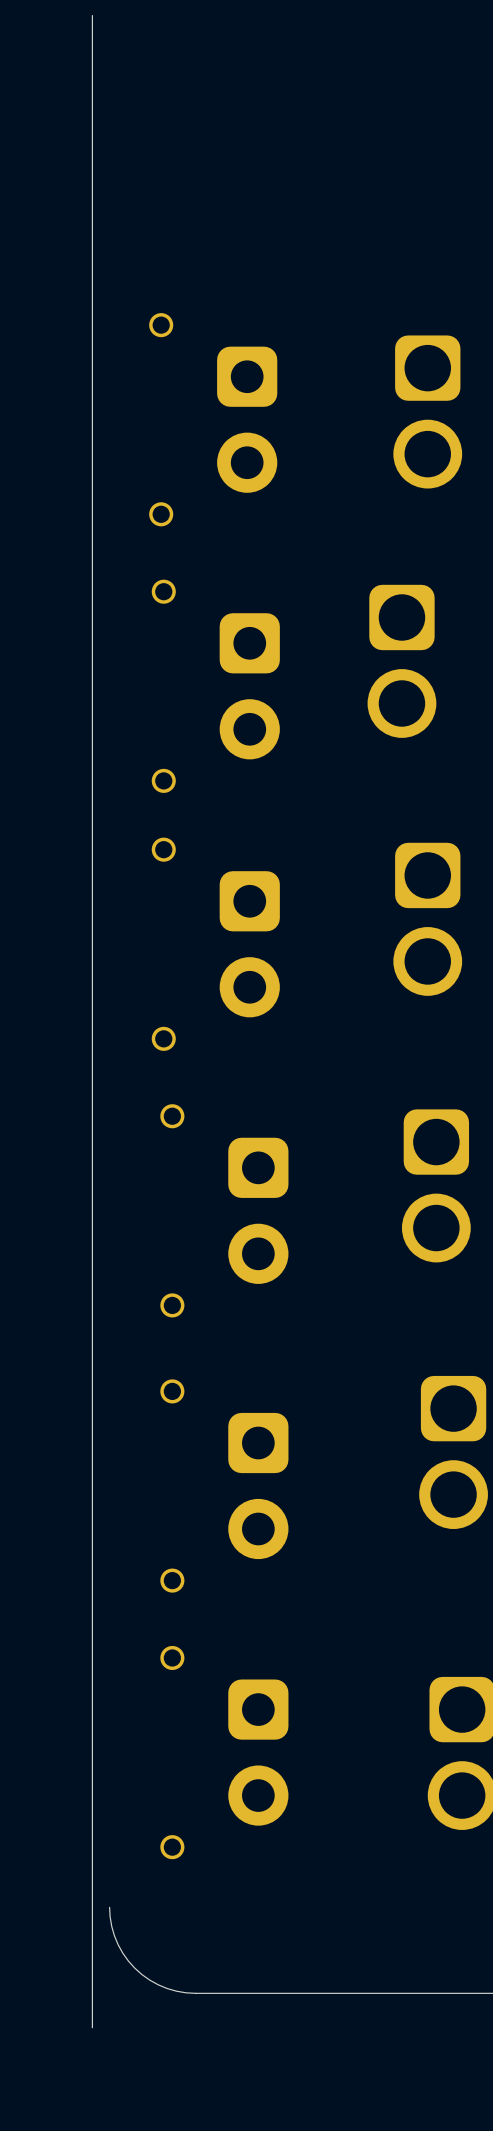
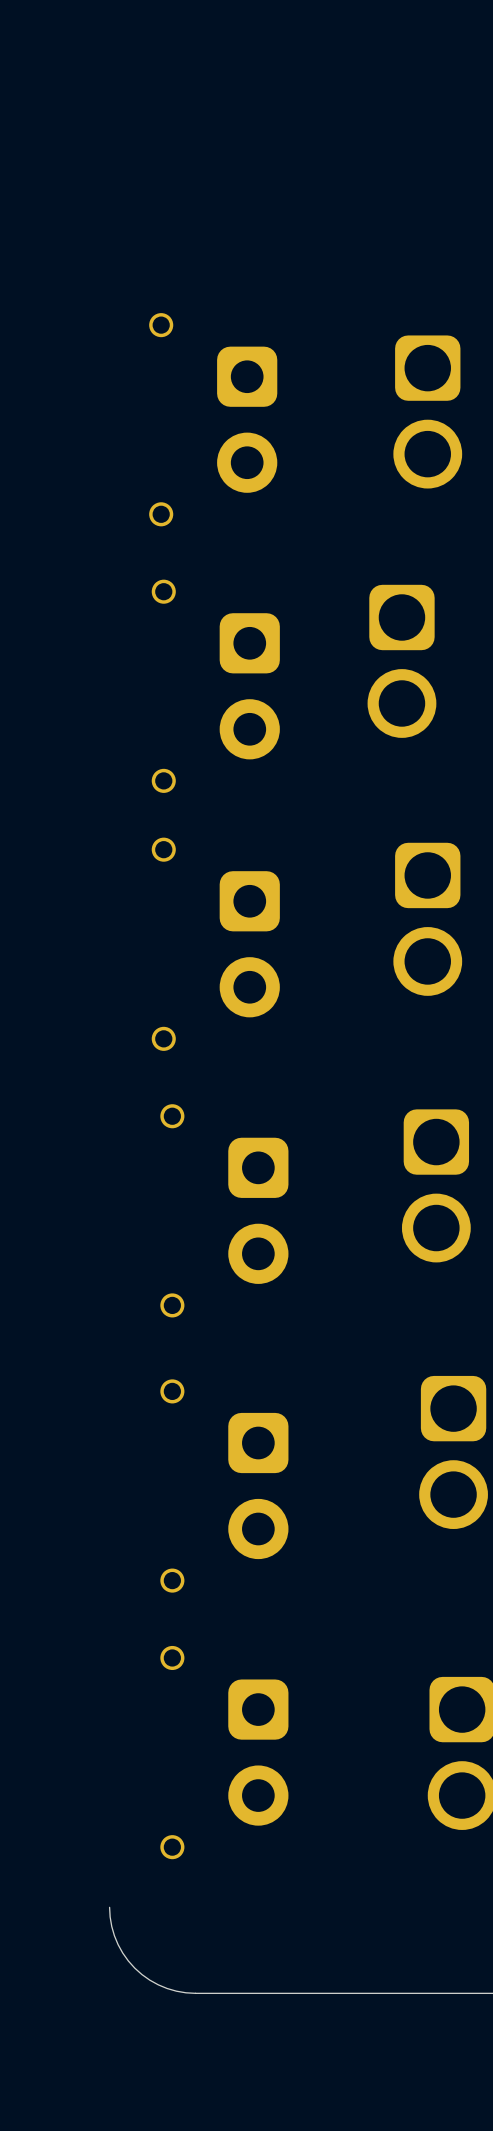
board edge: (92, 15) (92, 2027) -> none

